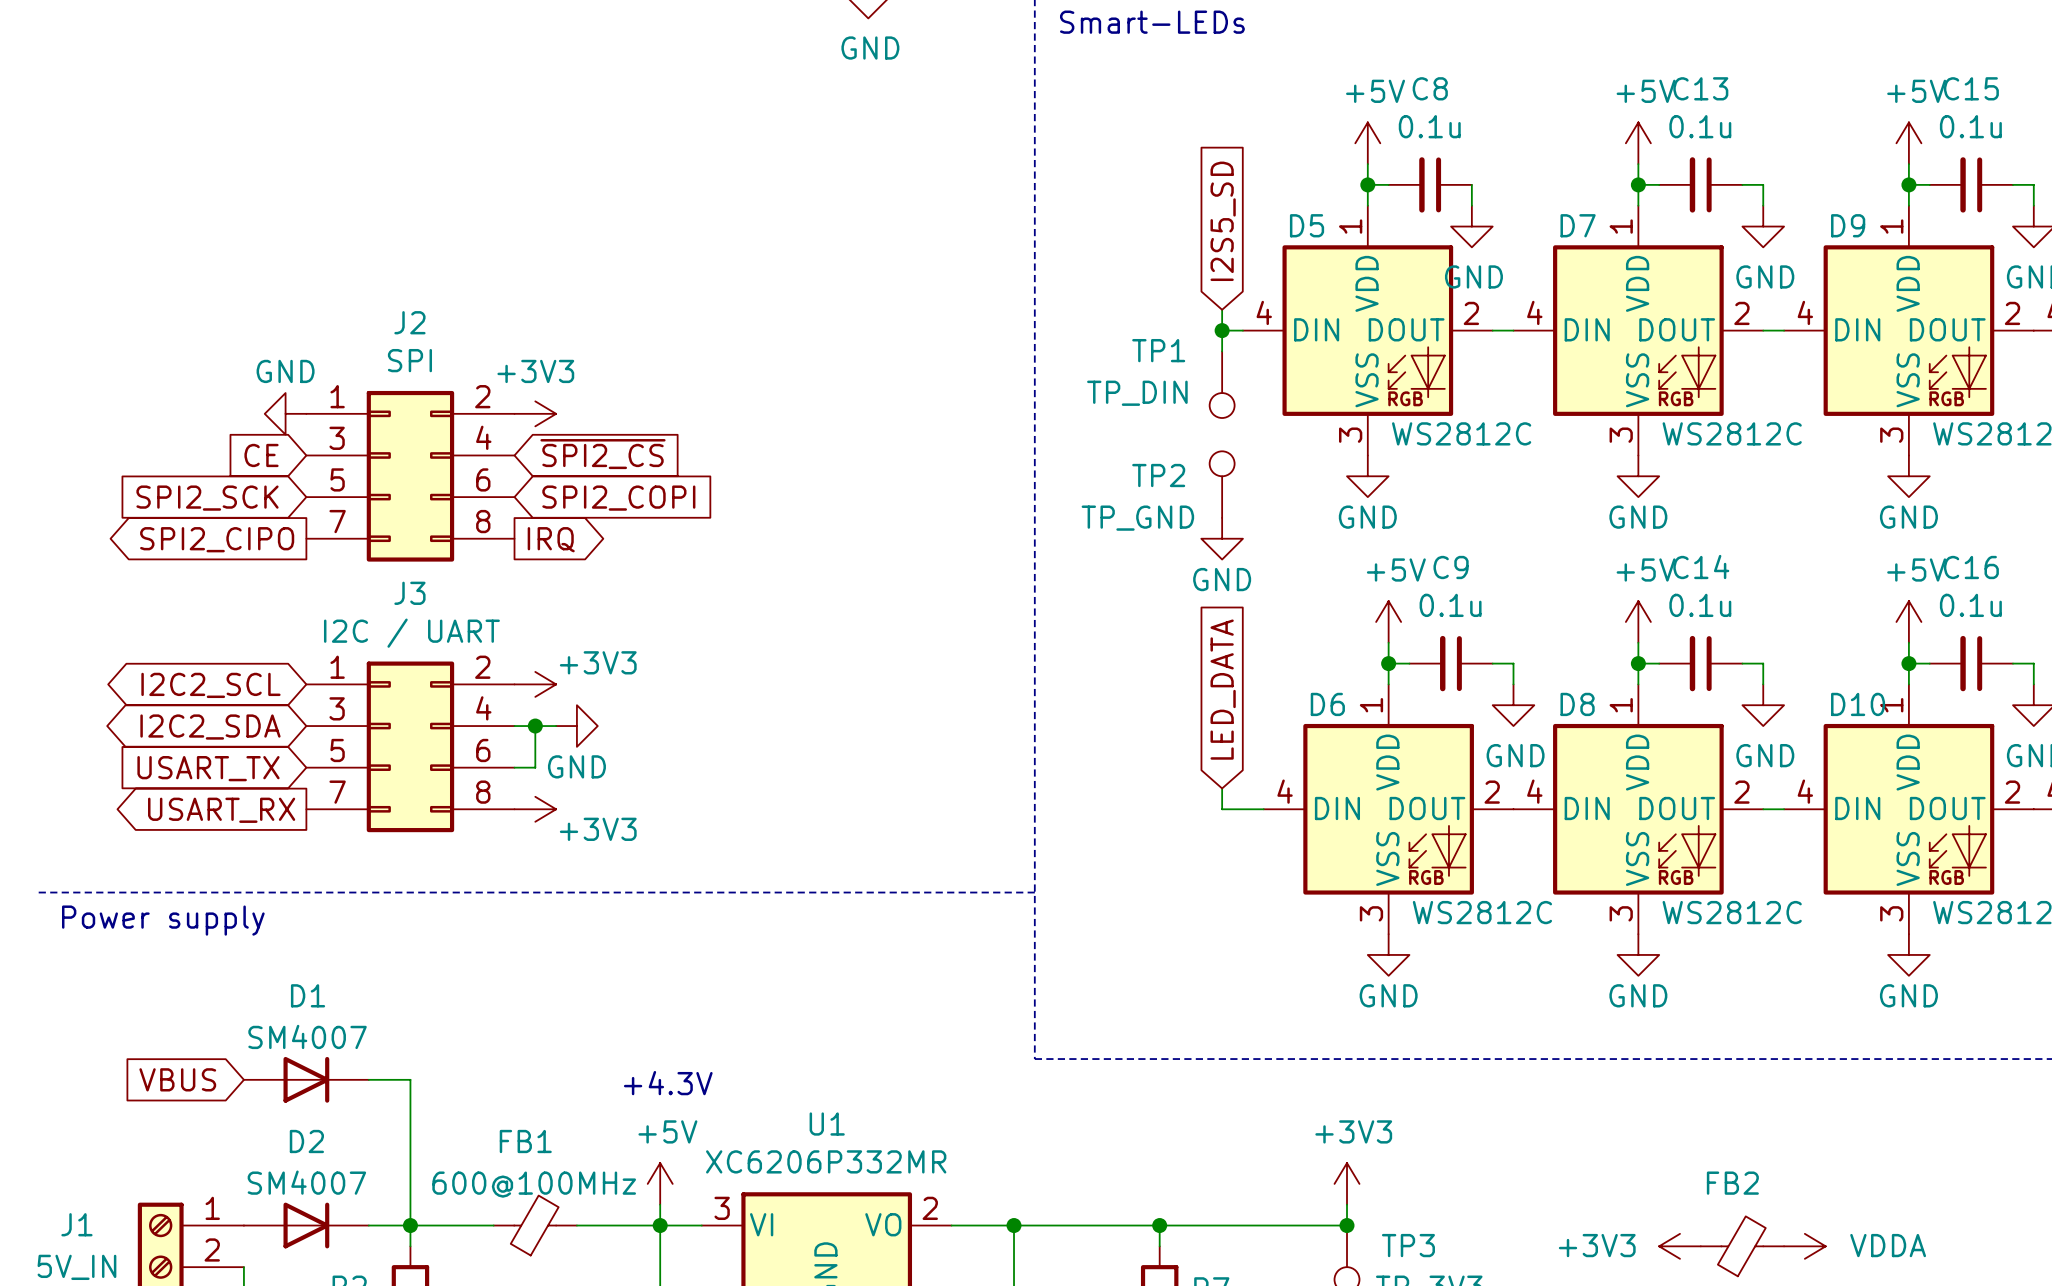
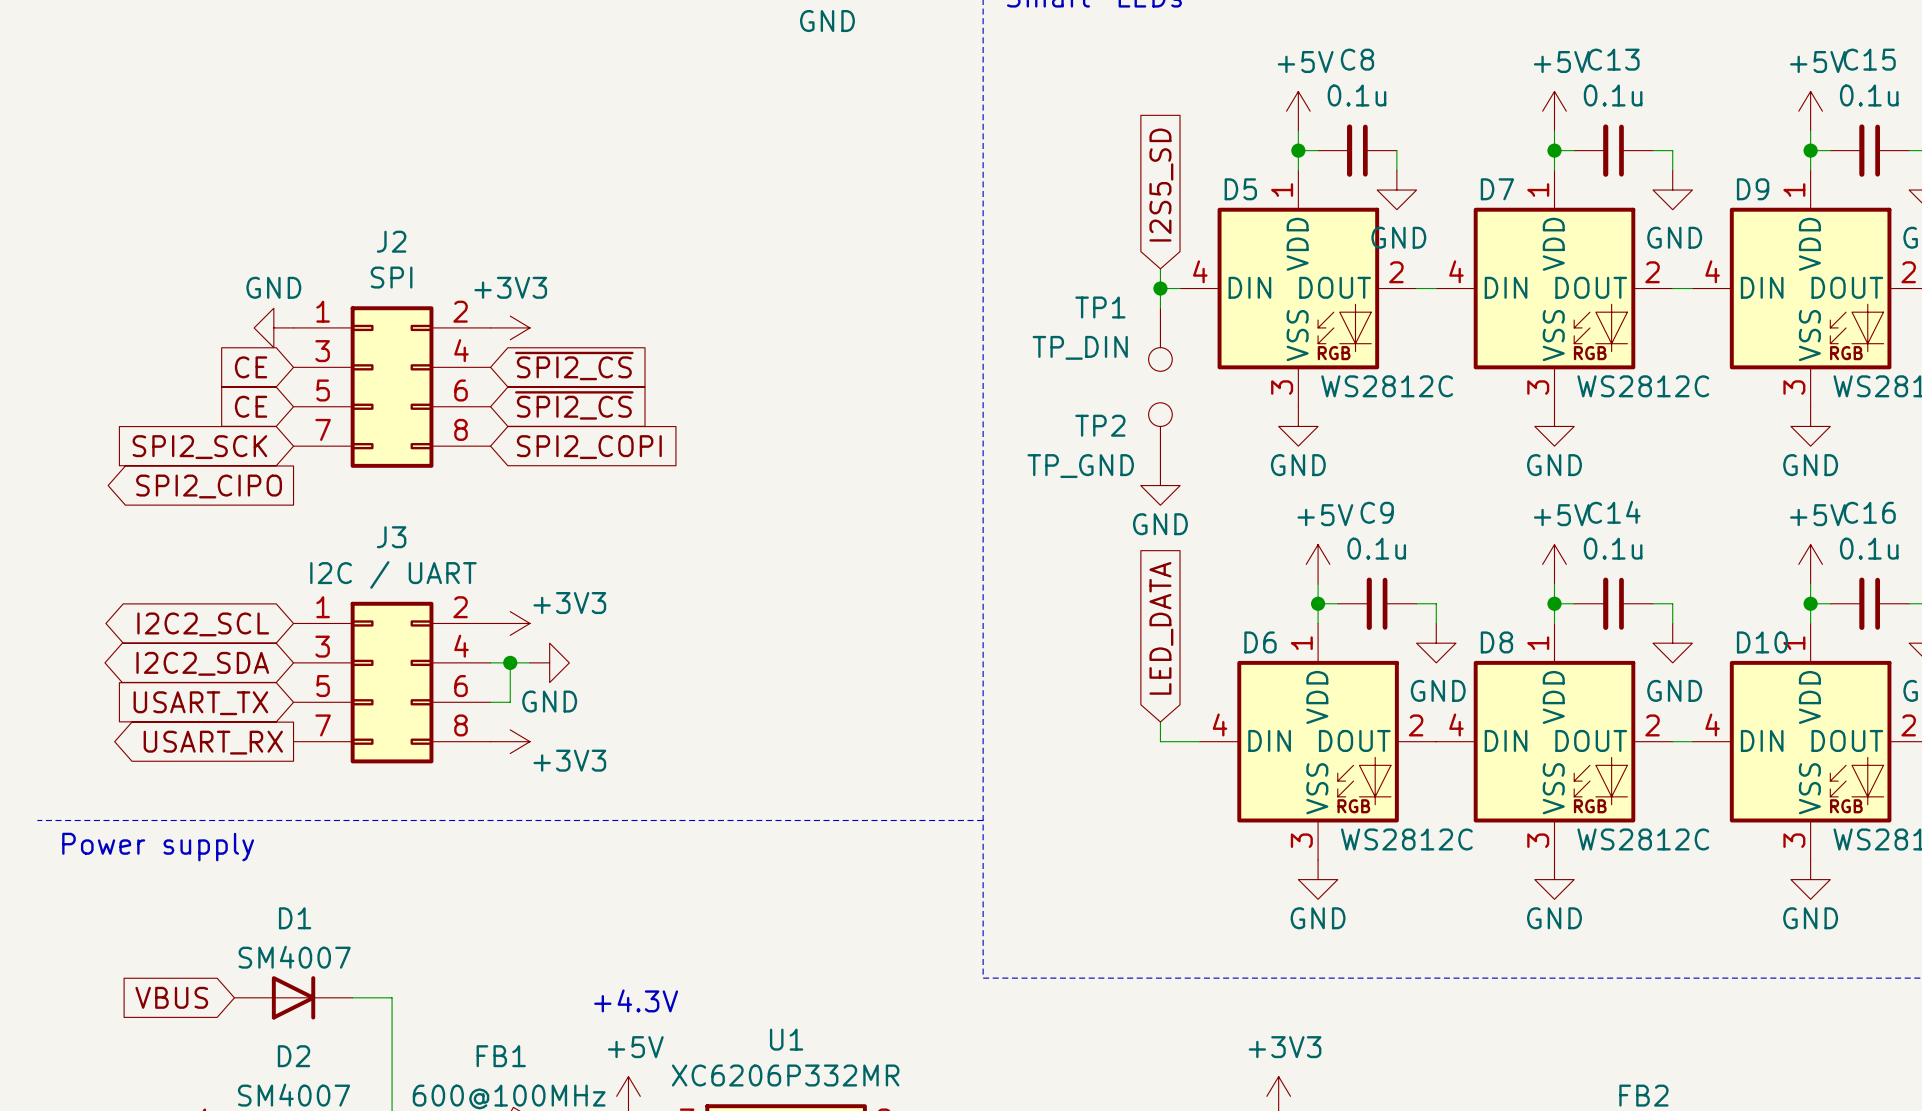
global label: none -> ~{SPI2_CS} (574, 366)
global label: none -> CE (251, 367)
power symbol position: GND (285, 413) -> GND (273, 327)
power symbol position: +3V3 (535, 413) -> +3V3 (510, 327)
J2 position: (410, 476) -> (392, 387)
global label: IRQ (551, 539) -> none

